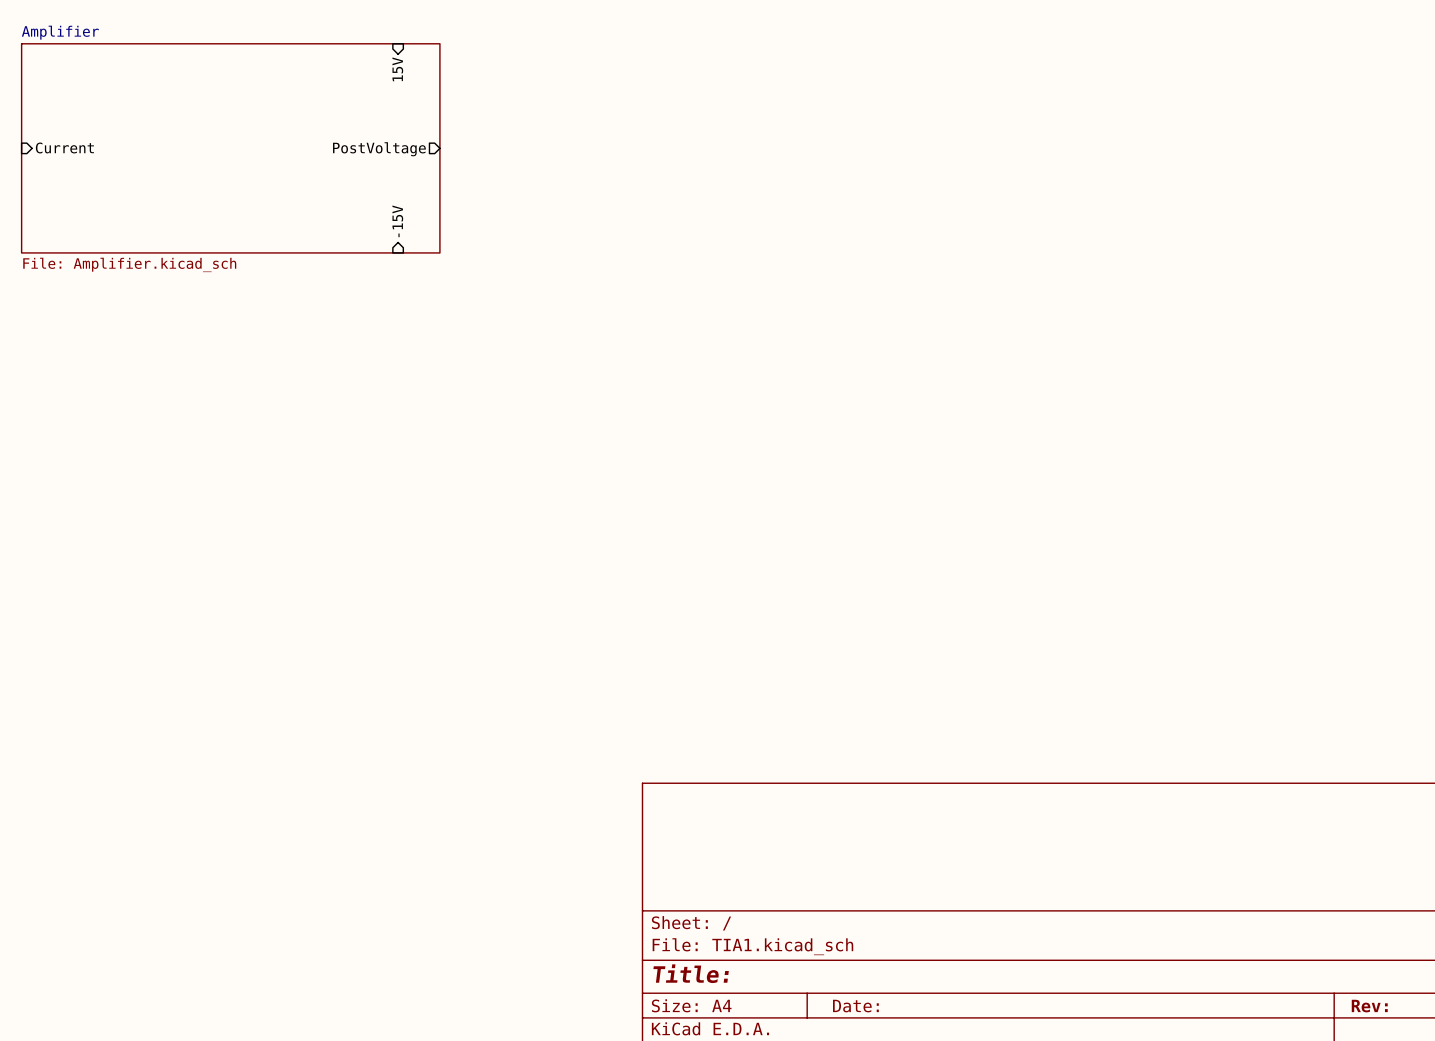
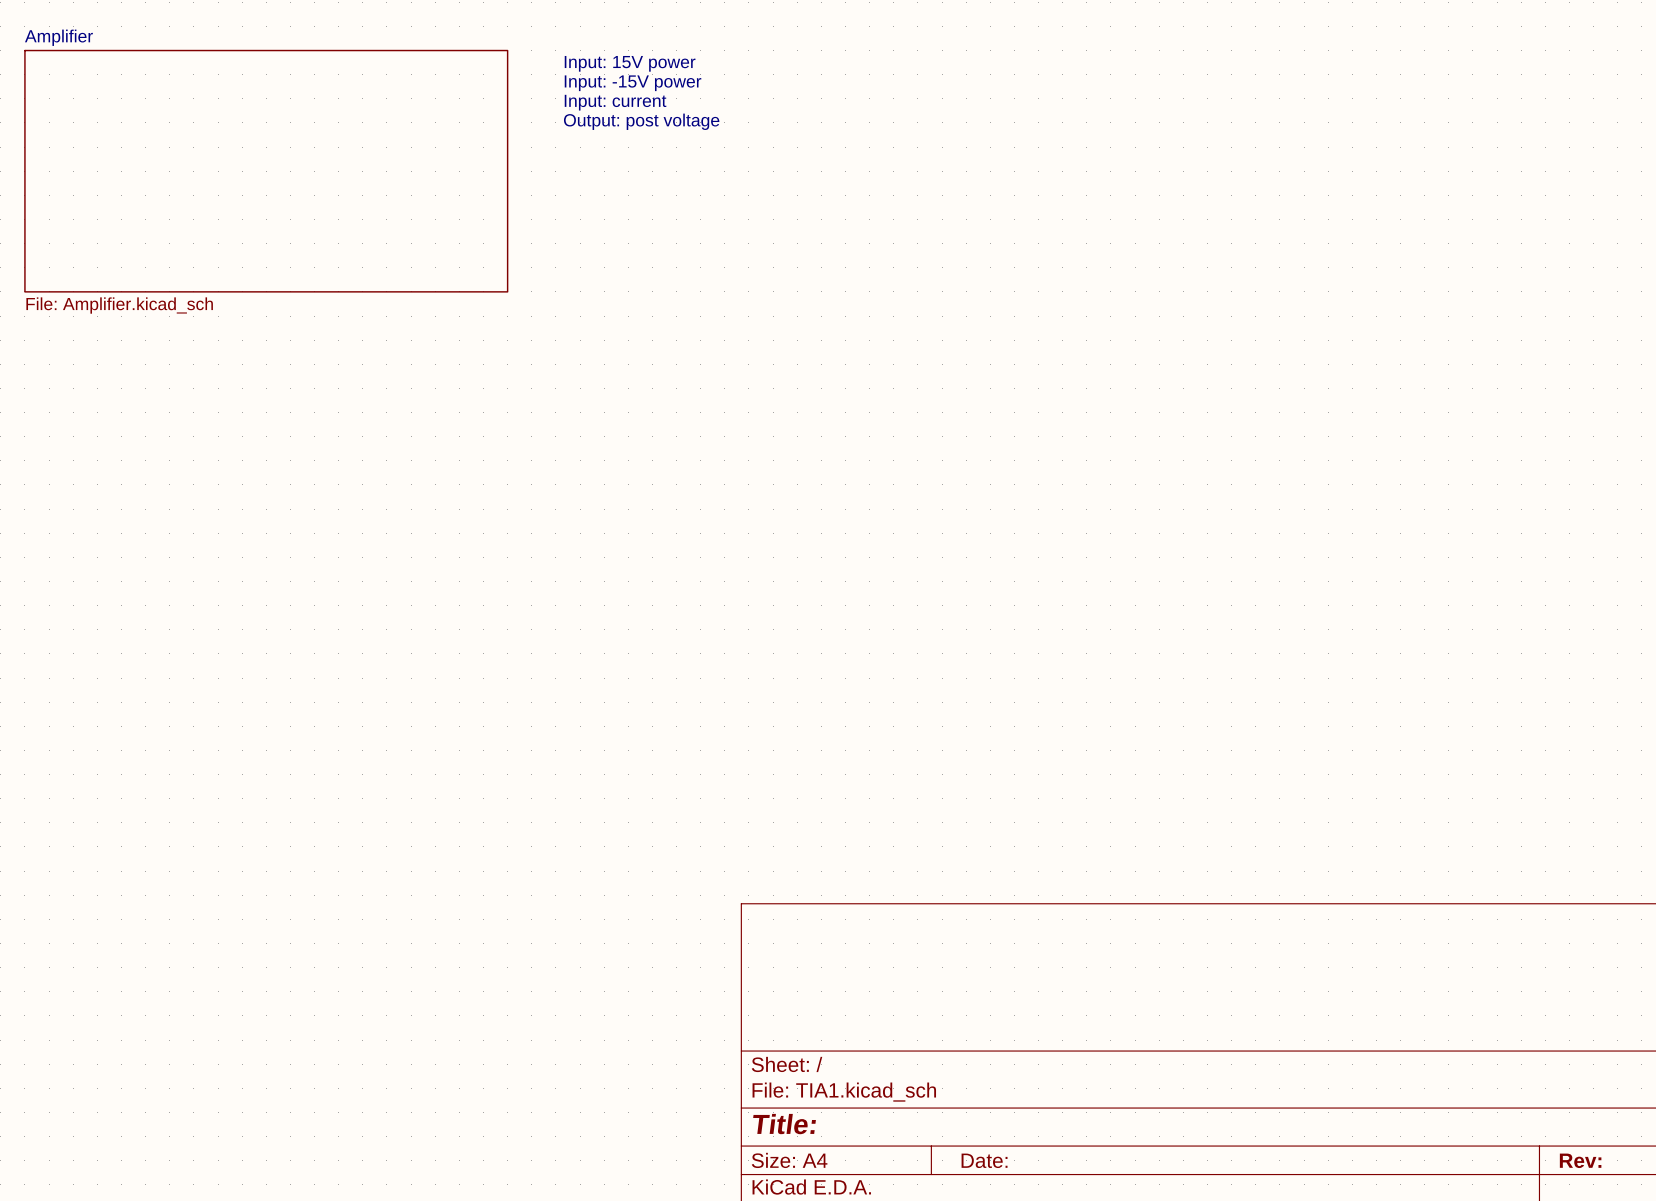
text: none -> Input: 15V power (630, 63)
sheet pin: 15V (397, 69) -> none
text: none -> Input: -15V power (633, 83)
text: none -> Input: current (615, 102)
text: none -> Output: post voltage (641, 121)
sheet pin: Current (64, 147) -> none
sheet pin: PostVoltage (379, 149) -> none
sheet pin: -15V (397, 221) -> none

